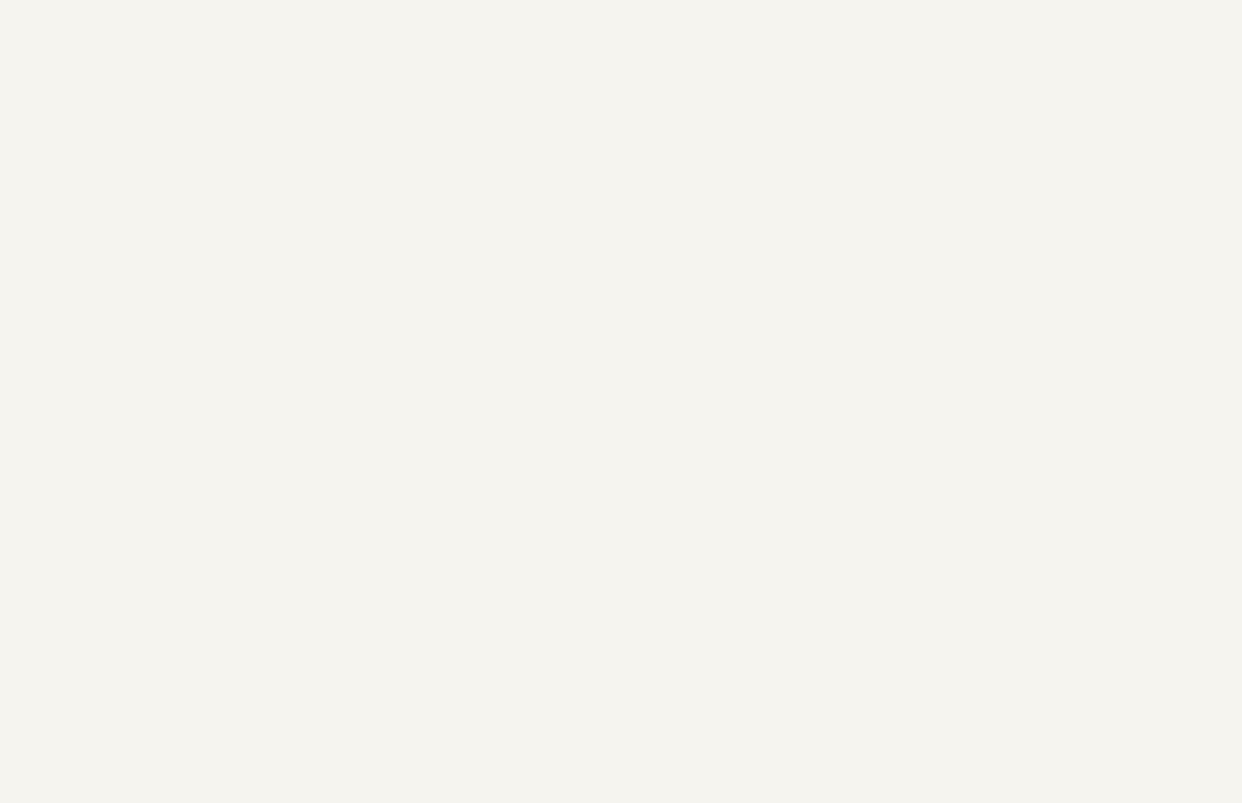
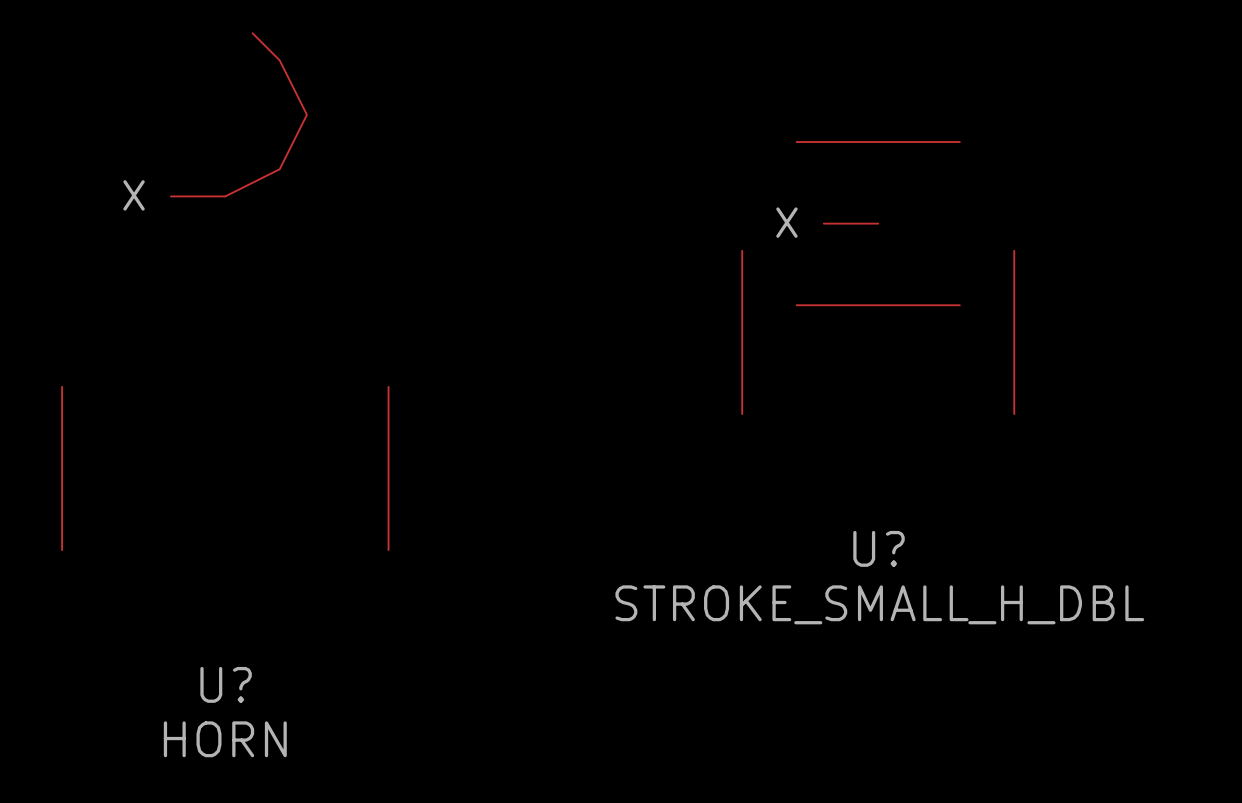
U?: none -> STROKE_SMALL_H_DBL (878, 278)
U?: none -> HORN (225, 291)

